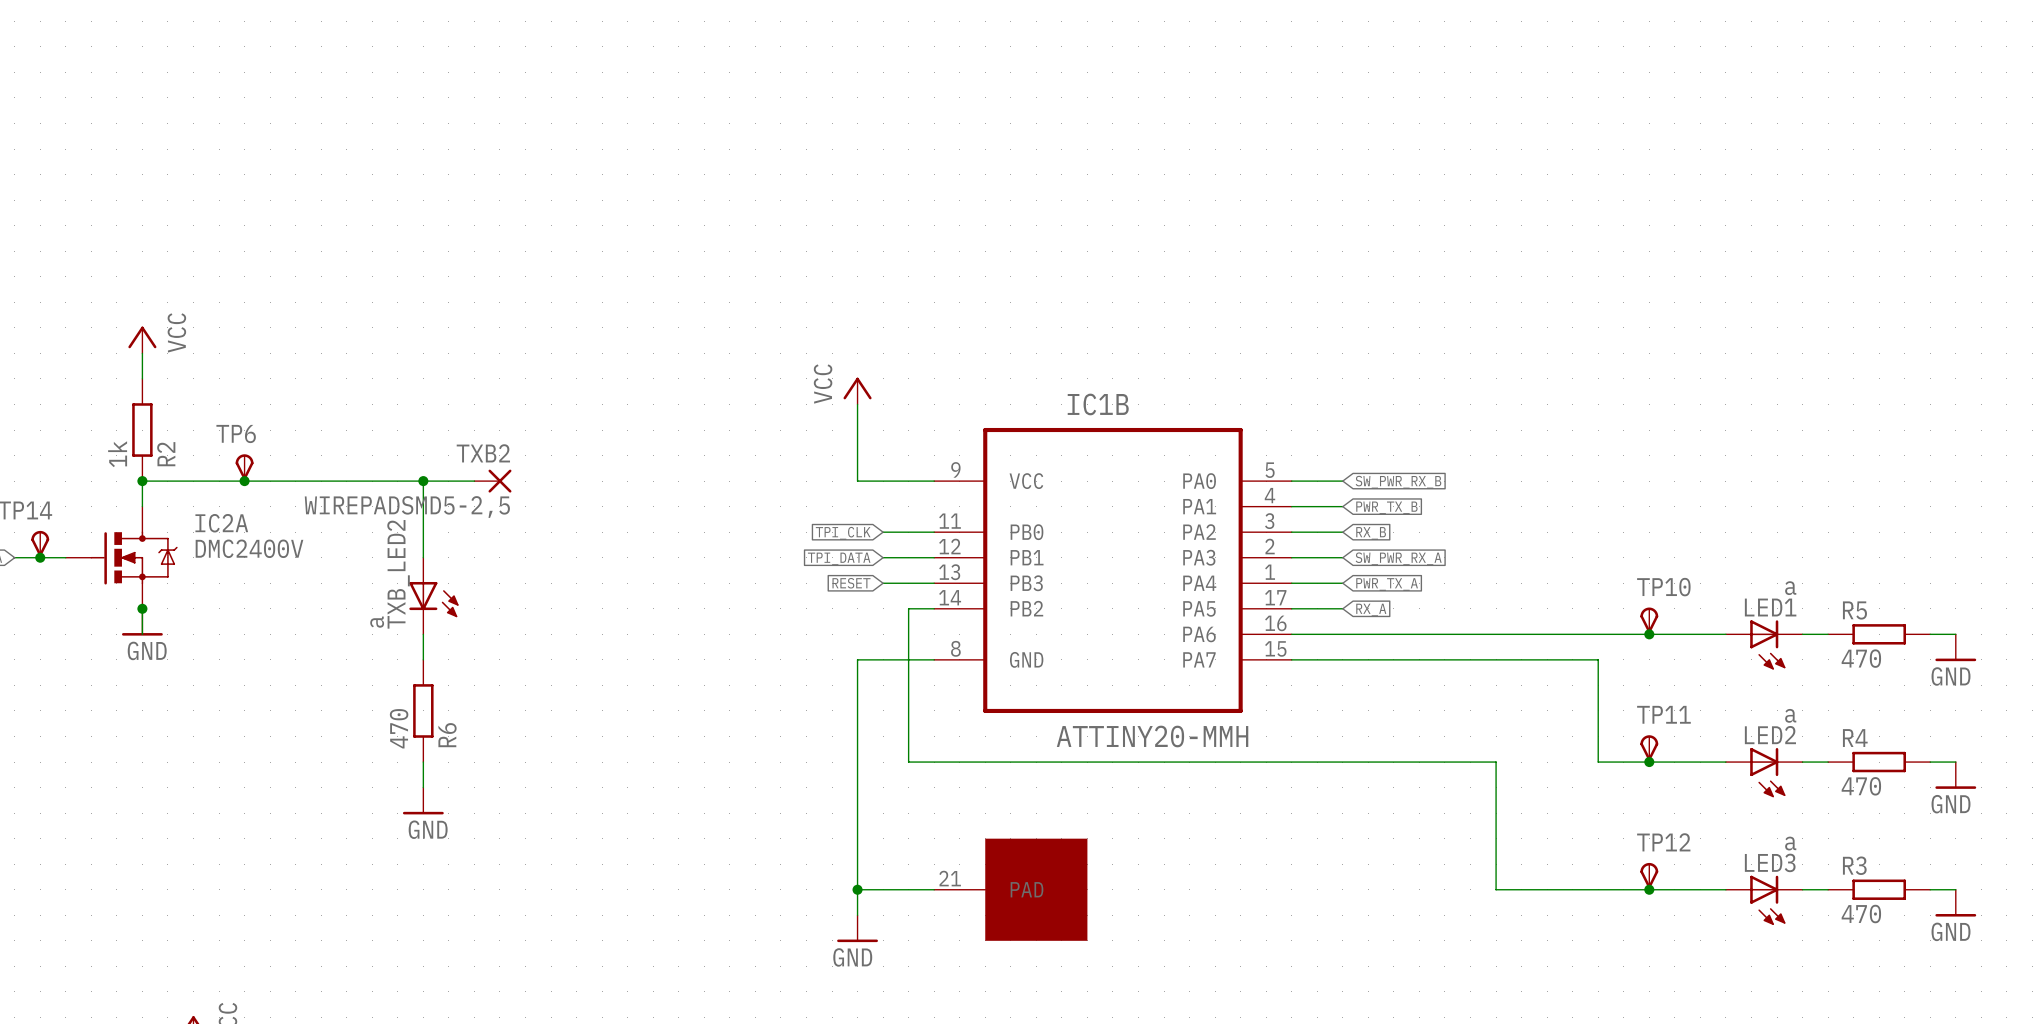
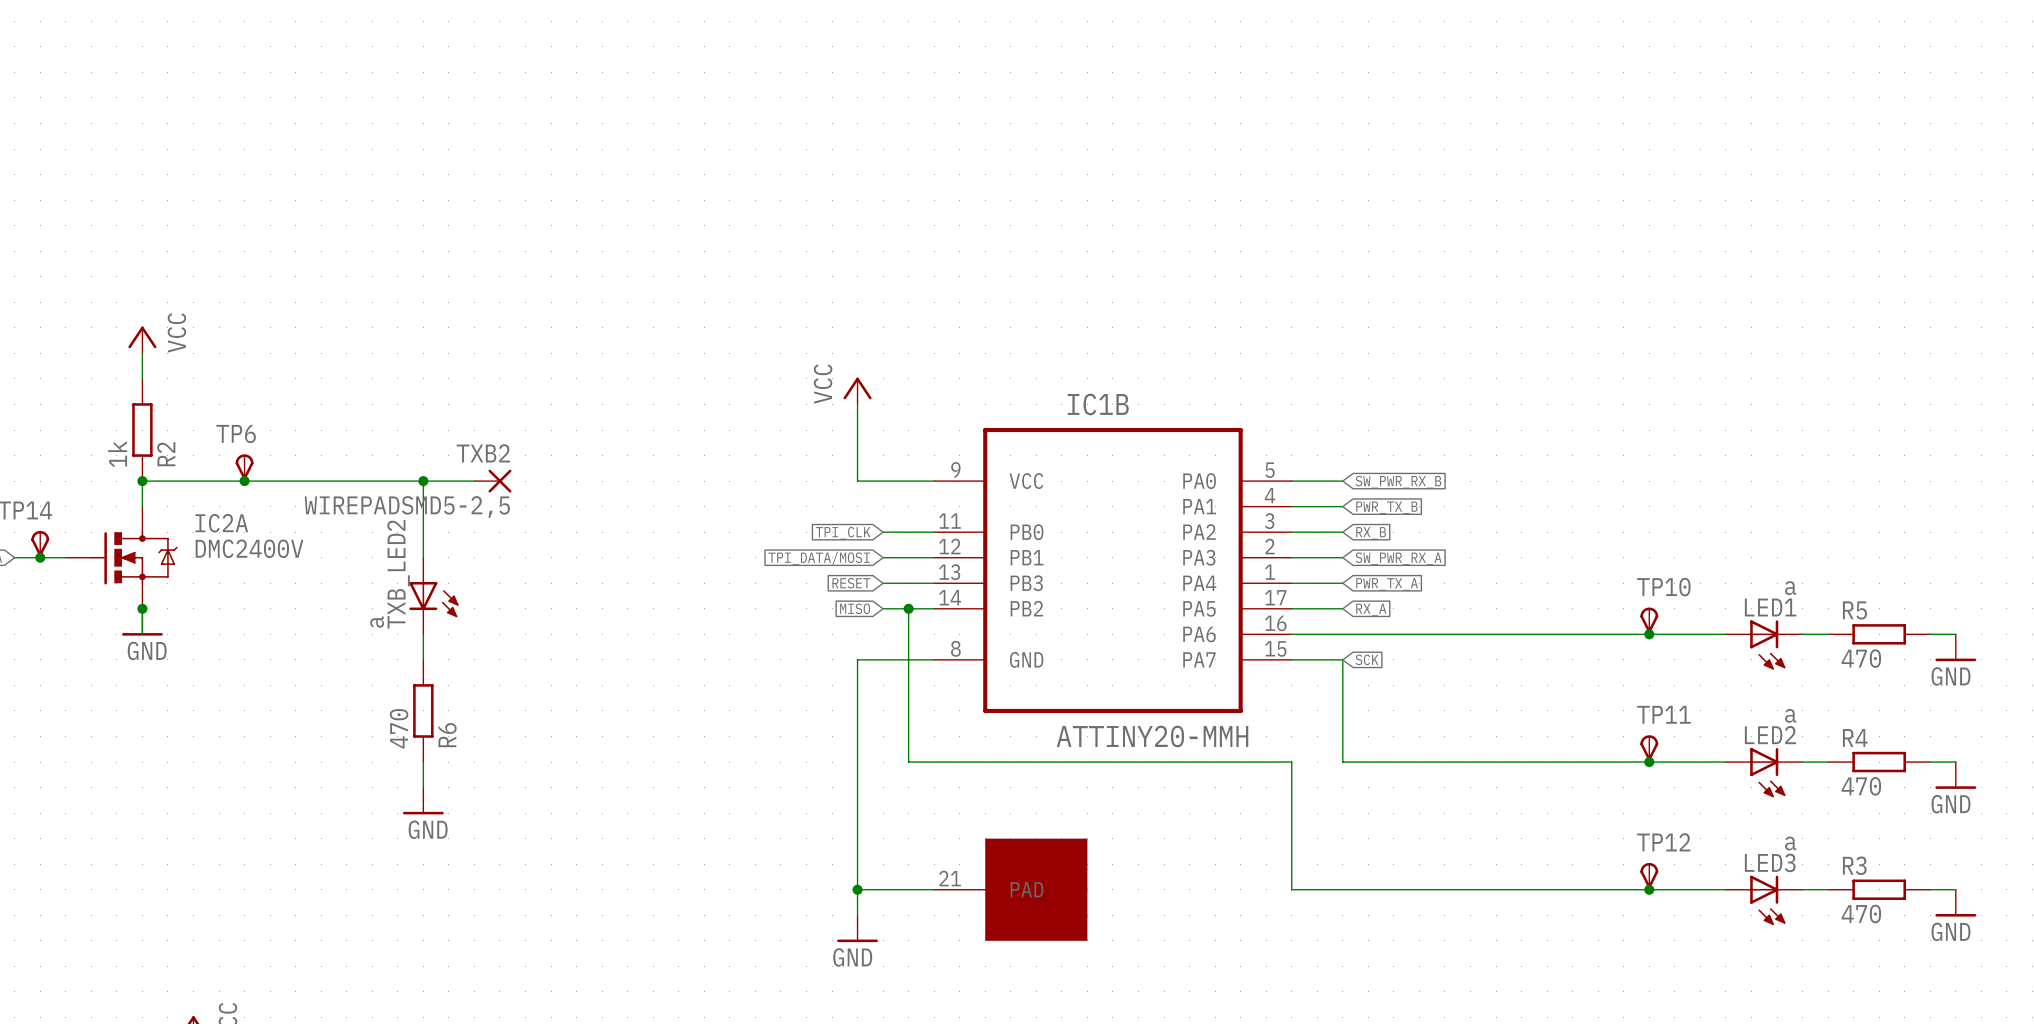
global label: TPI_DATA (839, 558) -> TPI_DATA/MOSI (819, 558)
global label: none -> MISO (855, 608)
wire: none -> (883, 608) (908, 608)
junction: none -> (908, 608)
wire: (1342, 659) (1598, 659) (1598, 762) -> none
global label: none -> SCK (1367, 659)
wire: (1291, 762) (1342, 762) -> (1342, 659) (1342, 762)
wire: none -> (1291, 762) (1291, 889) (1496, 889)
wire: (1496, 762) (1496, 889) -> (1496, 762) (1598, 762)

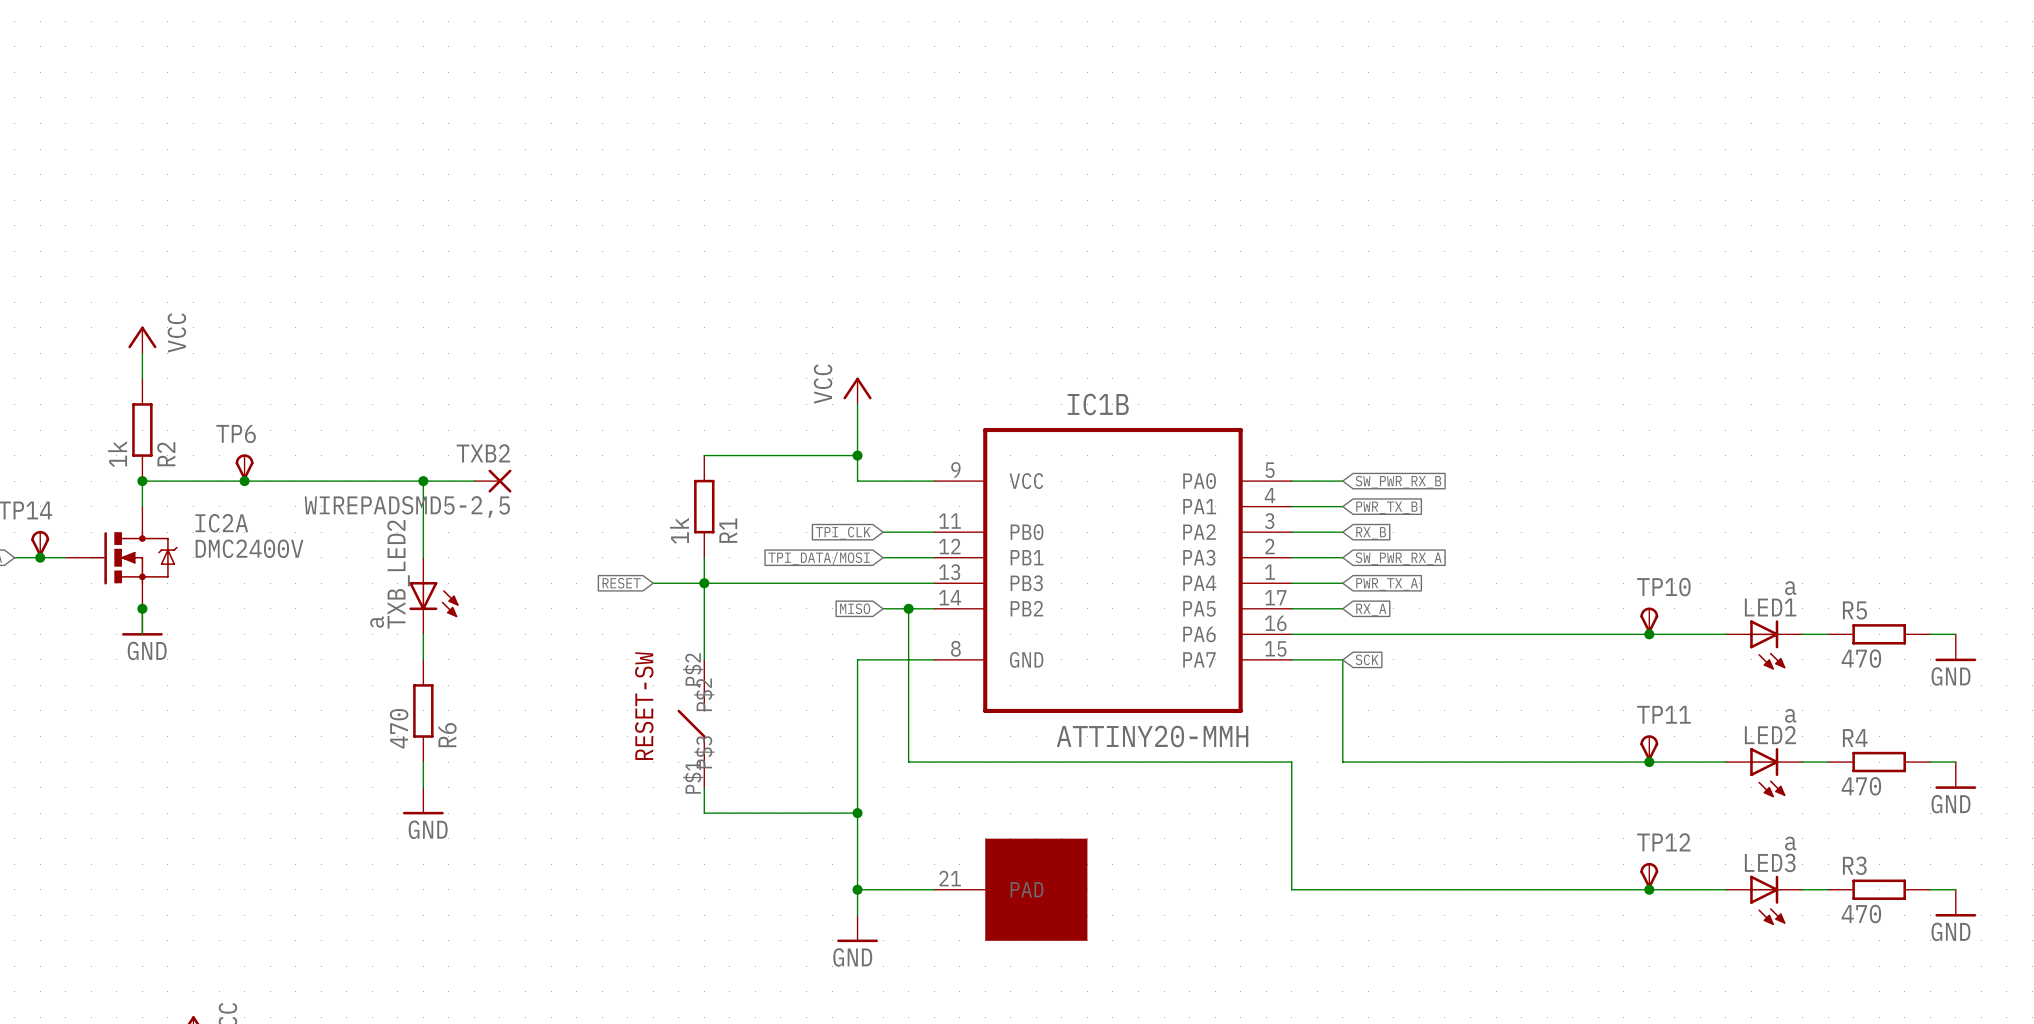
wire: none -> (704, 455) (857, 455)
junction: none -> (857, 455)
R1: none -> 1k (704, 506)
wire: none -> (704, 557) (704, 659)
wire: none -> (653, 583) (883, 583)
junction: none -> (704, 583)
global label position: RESET (851, 583) -> RESET (621, 583)
RESET-SW: none -> (691, 723)
wire: none -> (704, 787) (704, 813) (857, 813)
junction: none -> (857, 813)

